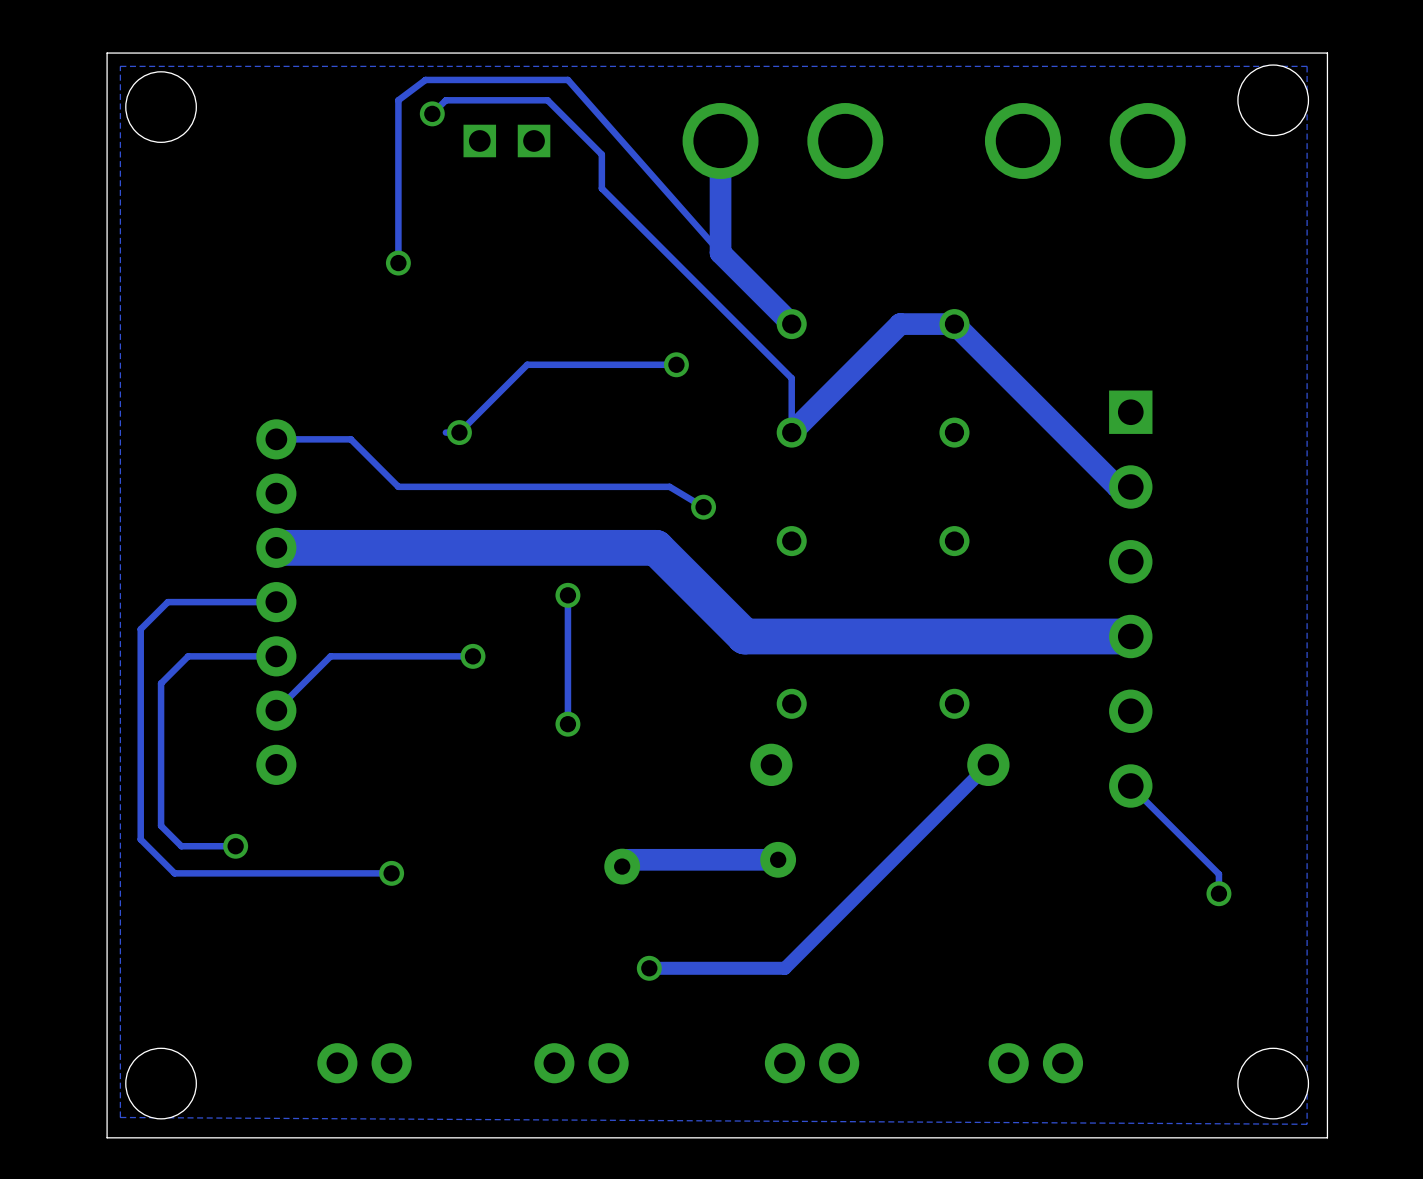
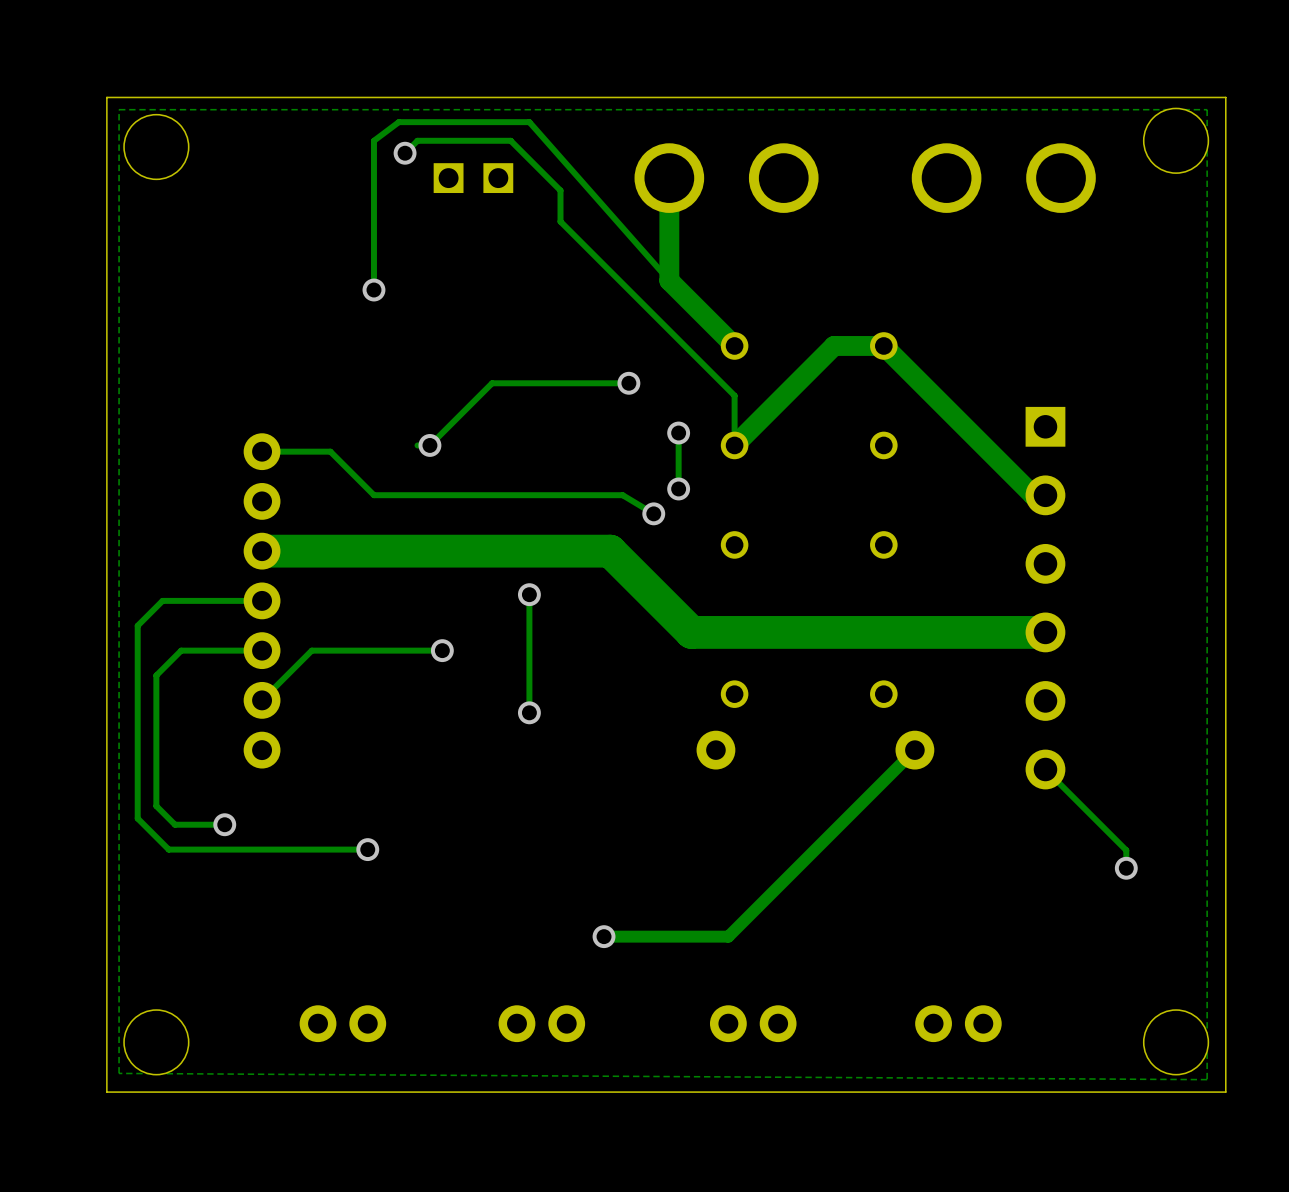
track: none -> (678, 433) (678, 488)
via: none -> (678, 433)
via: none -> (678, 488)
track: (778, 859) (628, 859) (622, 866) -> none
via: (778, 859) -> none
via: (622, 866) -> none

